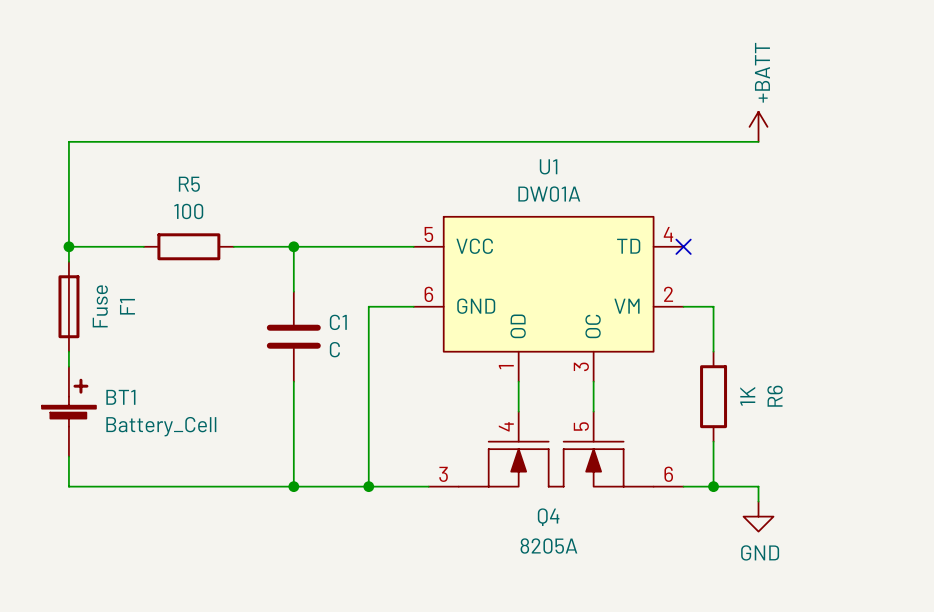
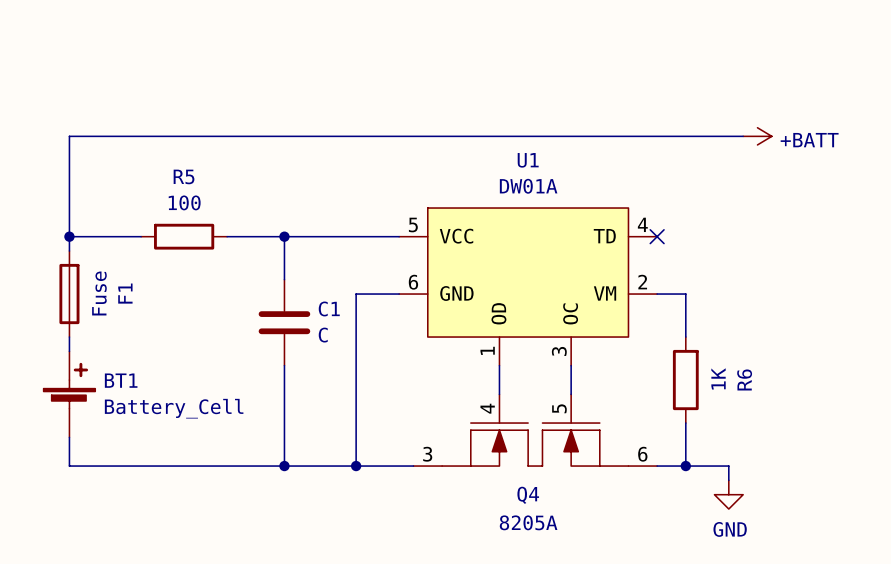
power symbol rotation: 0° (758, 126) -> 90° clockwise (757, 136)
power symbol position: +BATT (758, 126) -> +BATT (757, 136)
wire: none -> (728, 136) (743, 136)

